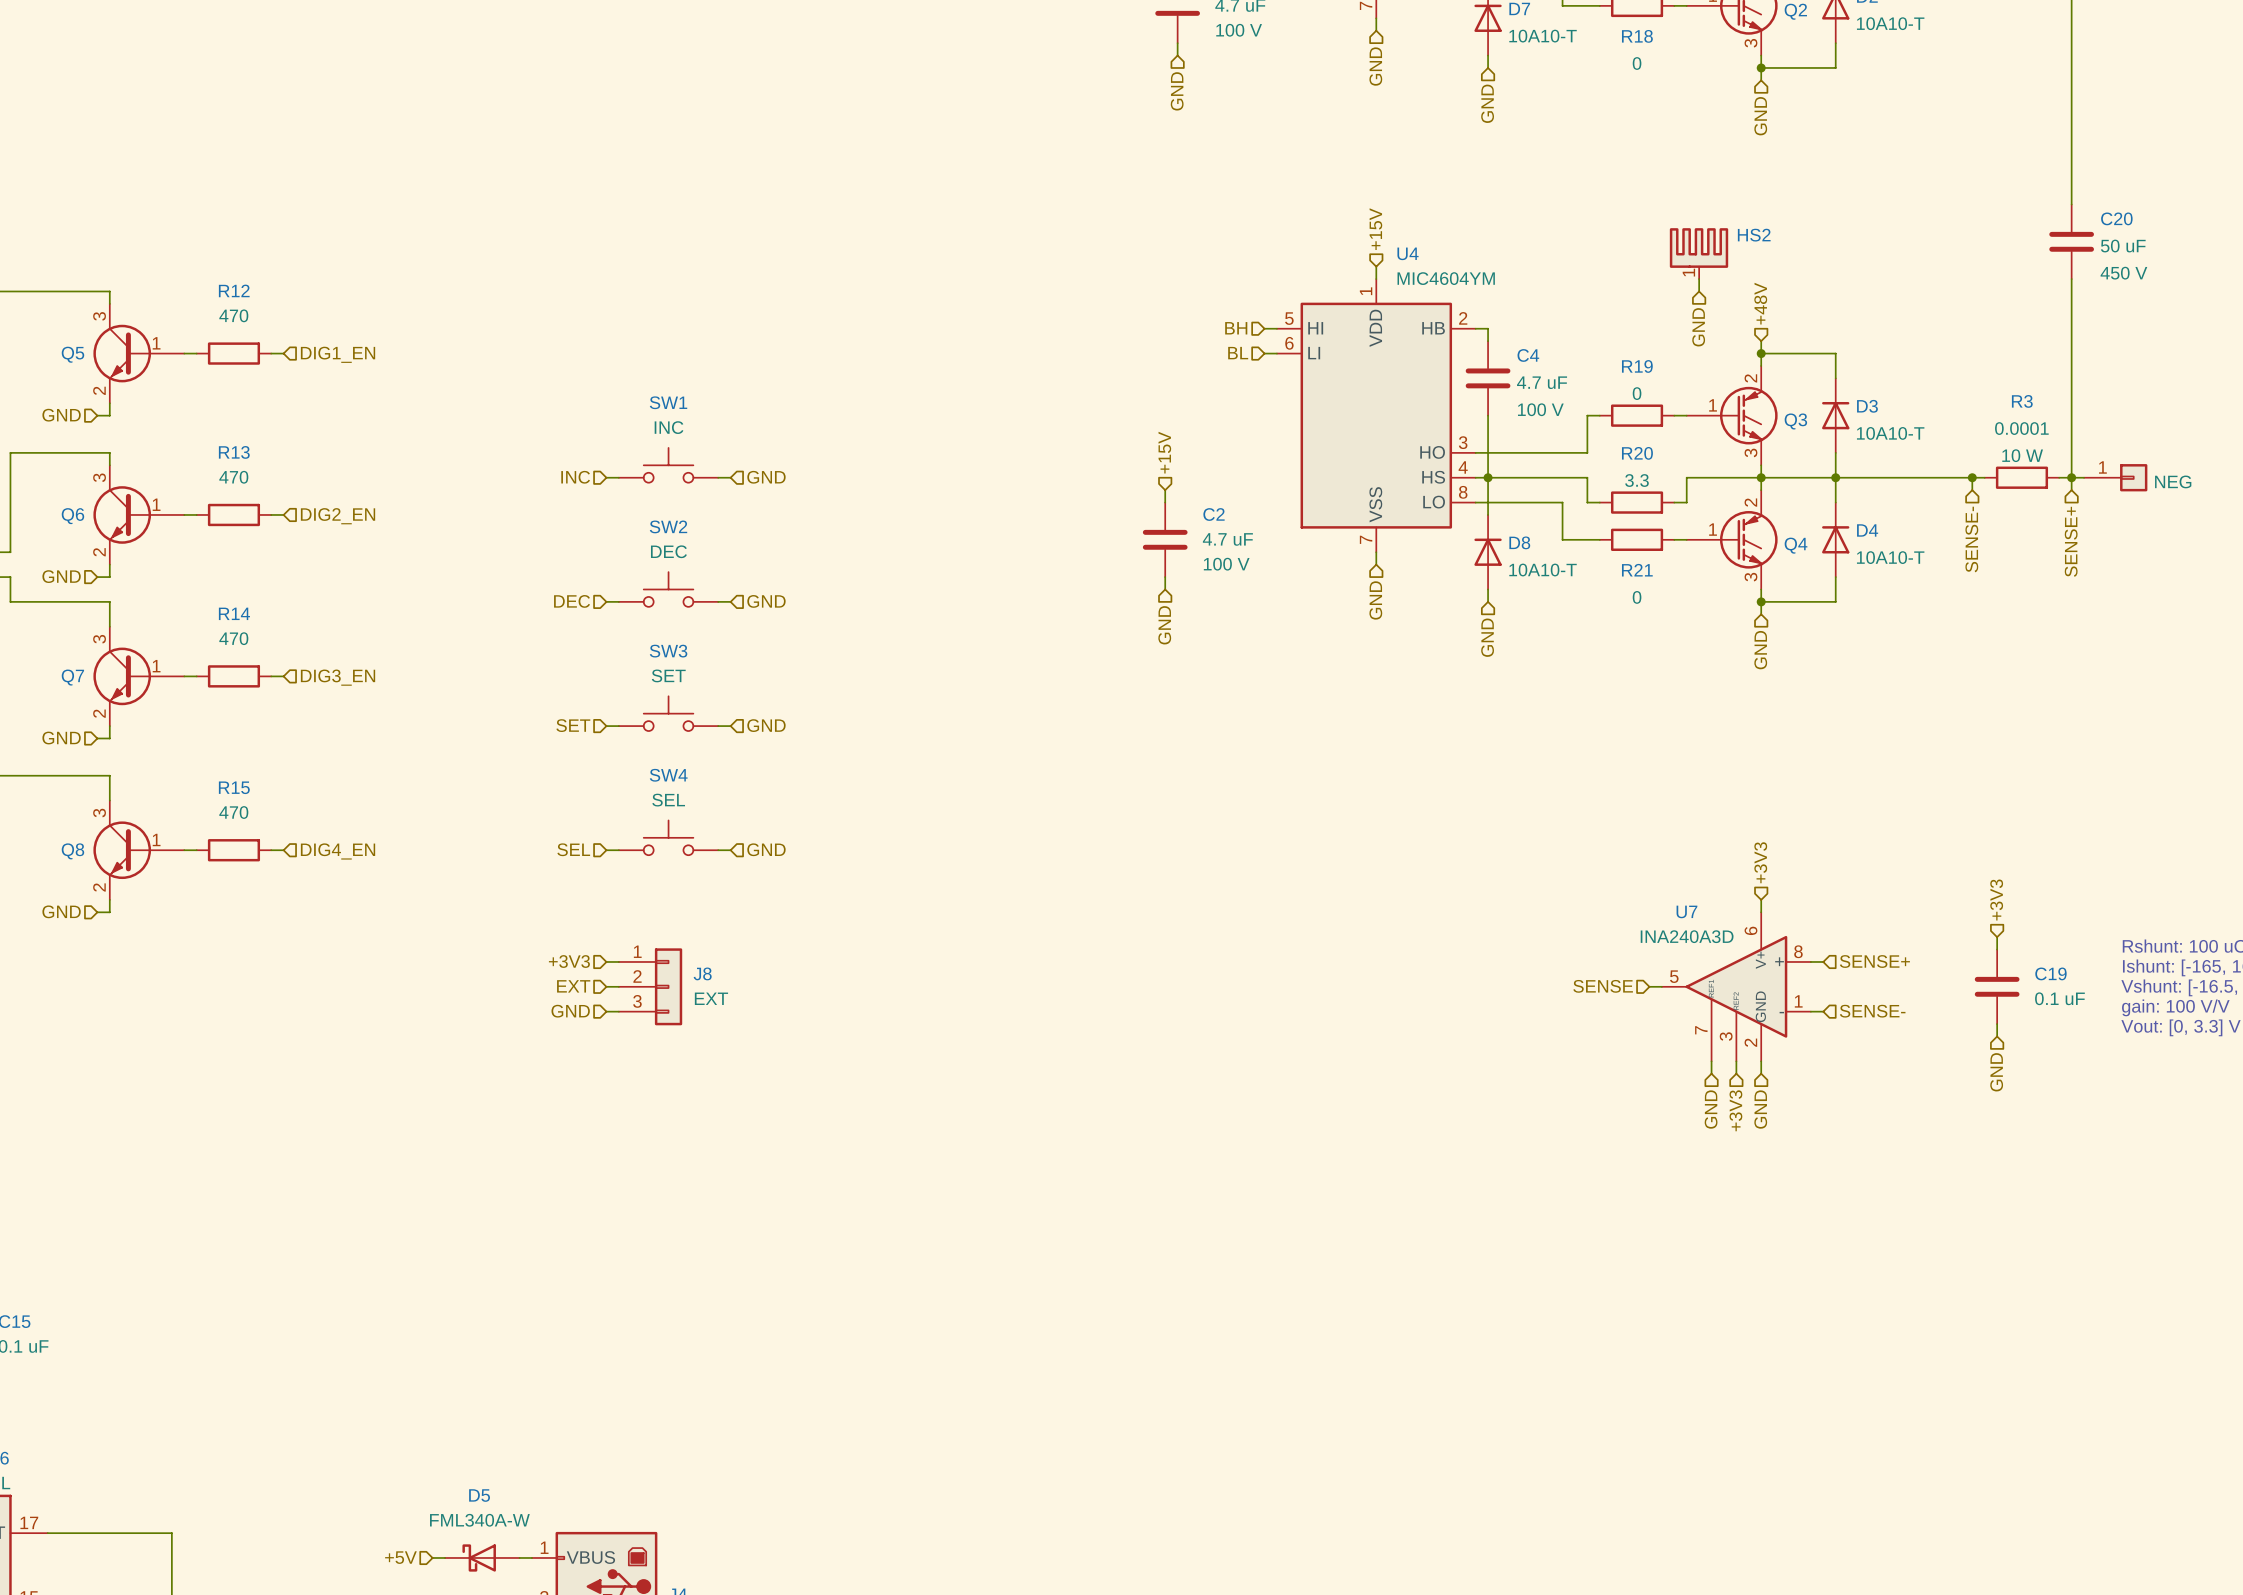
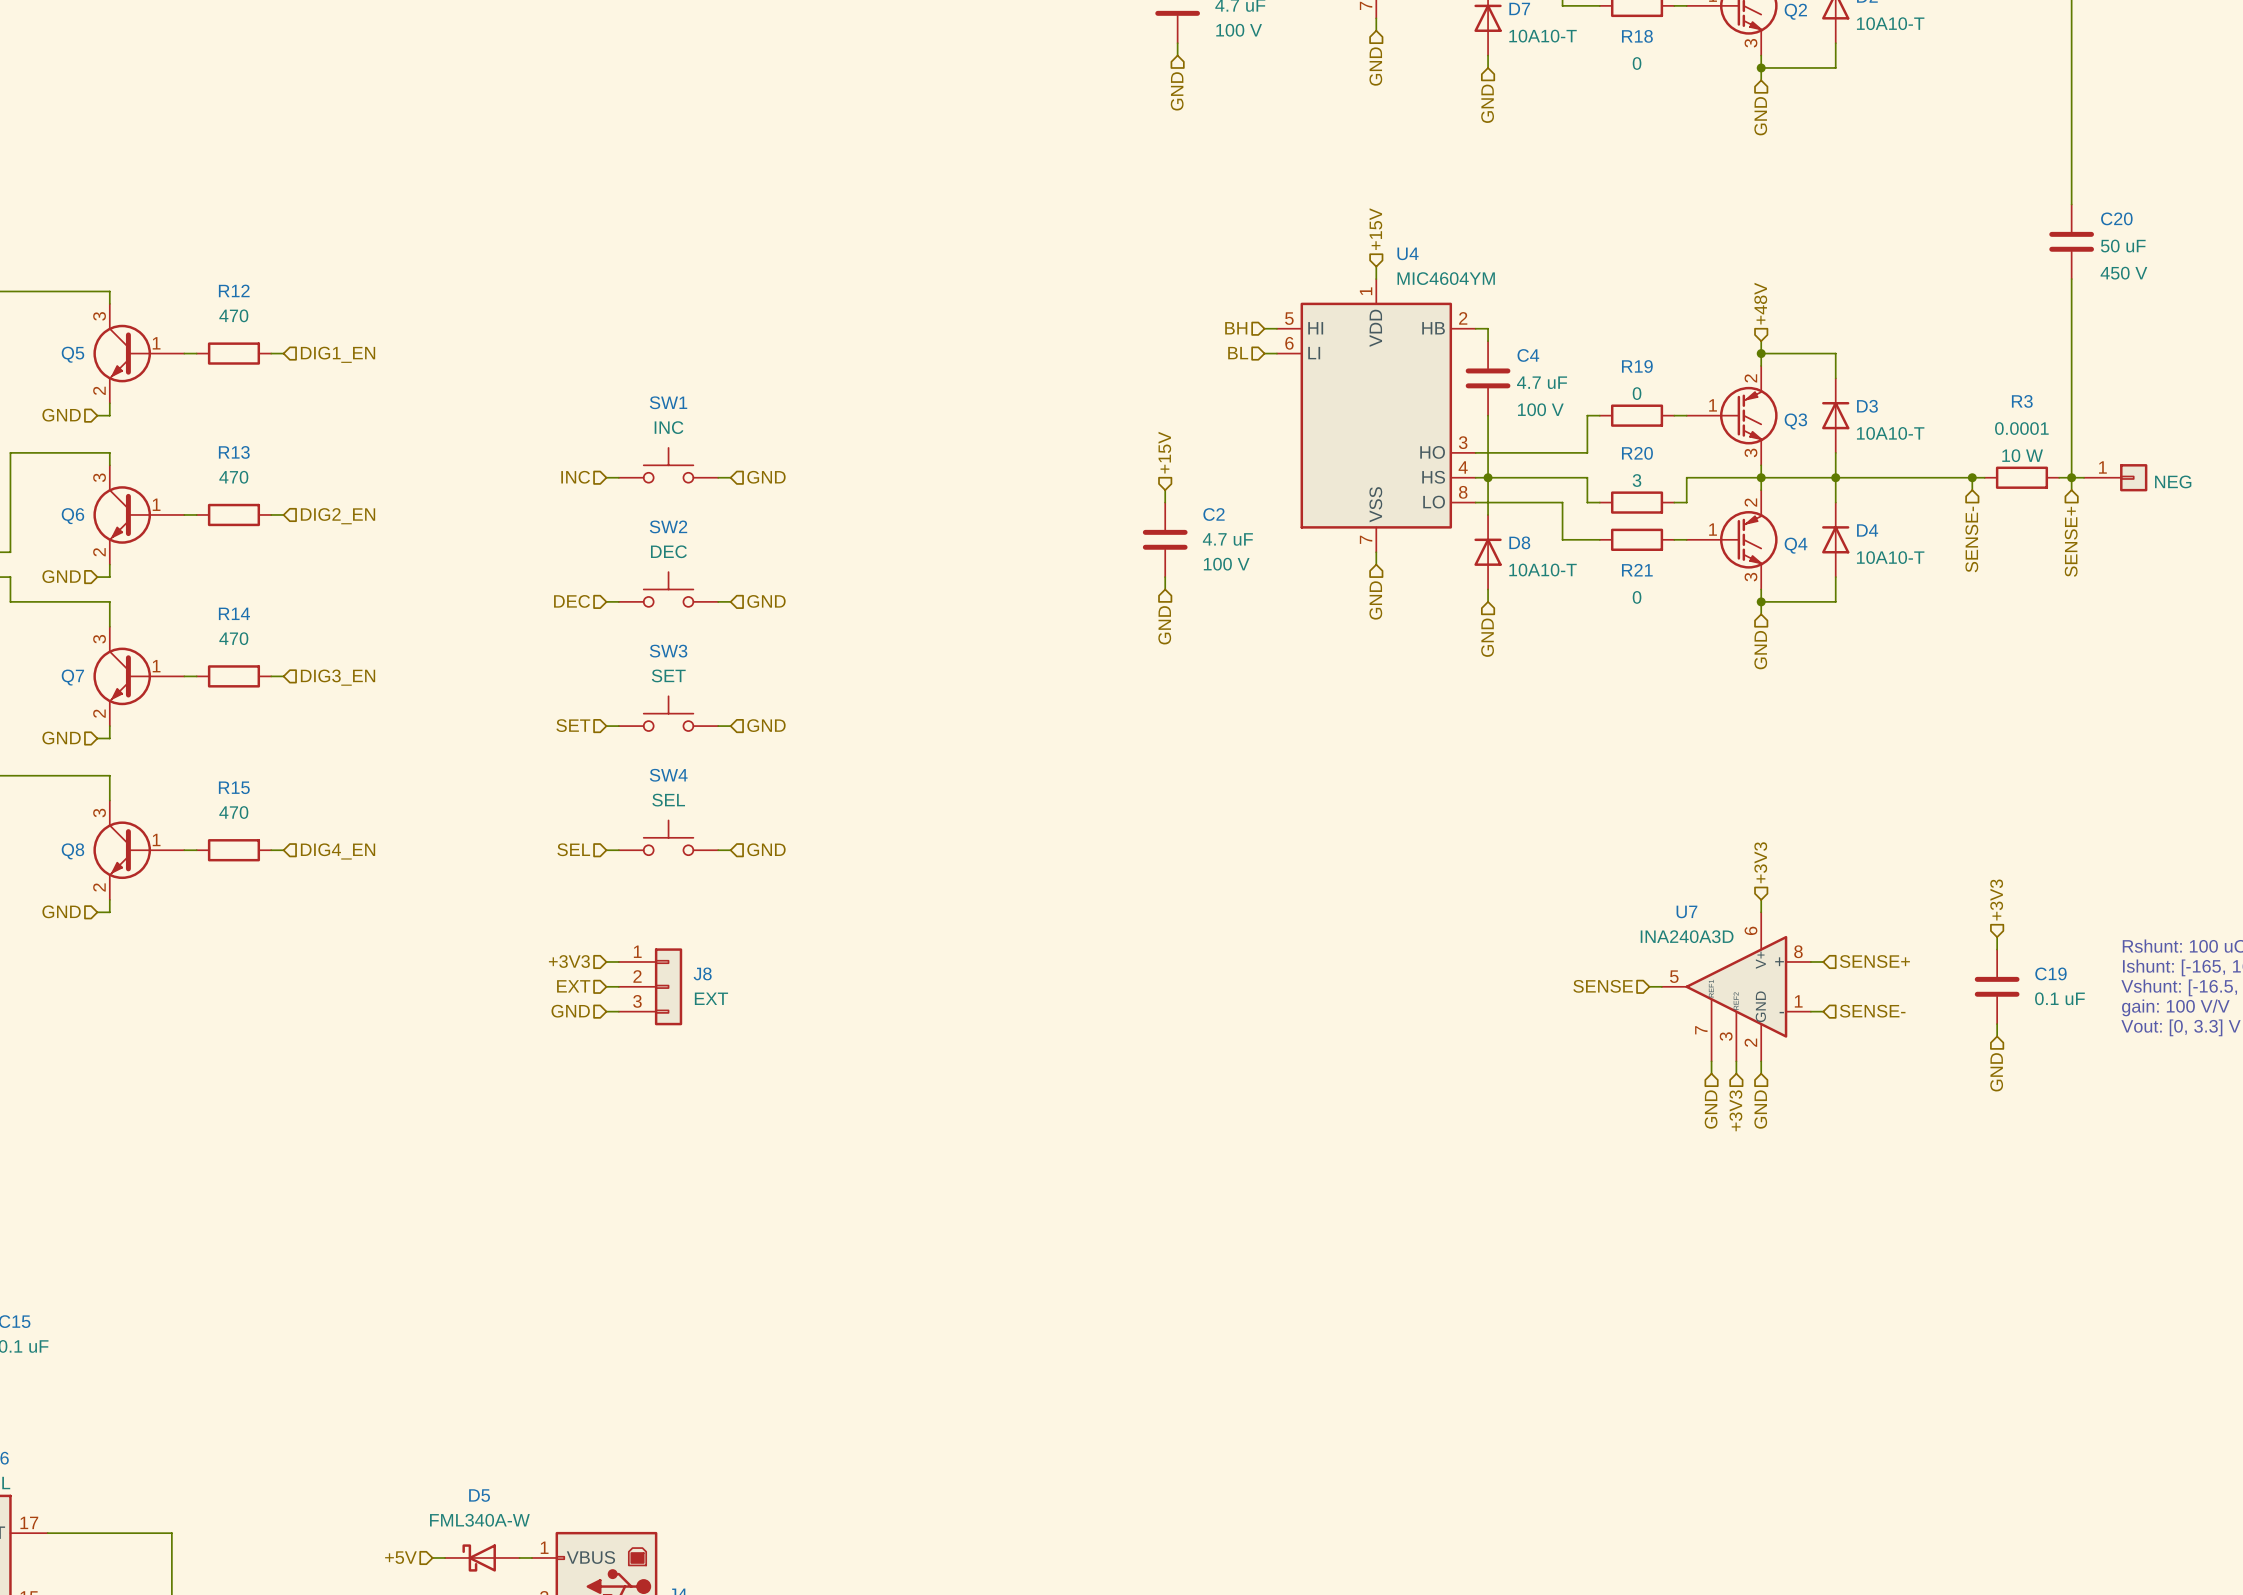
HS2: (1699, 253) -> none
wire: (1699, 279) (1699, 291) -> none
hierarchical label: GND (1698, 327) -> none
R20 value: 3.3 (1637, 480) -> 3 (1637, 480)

